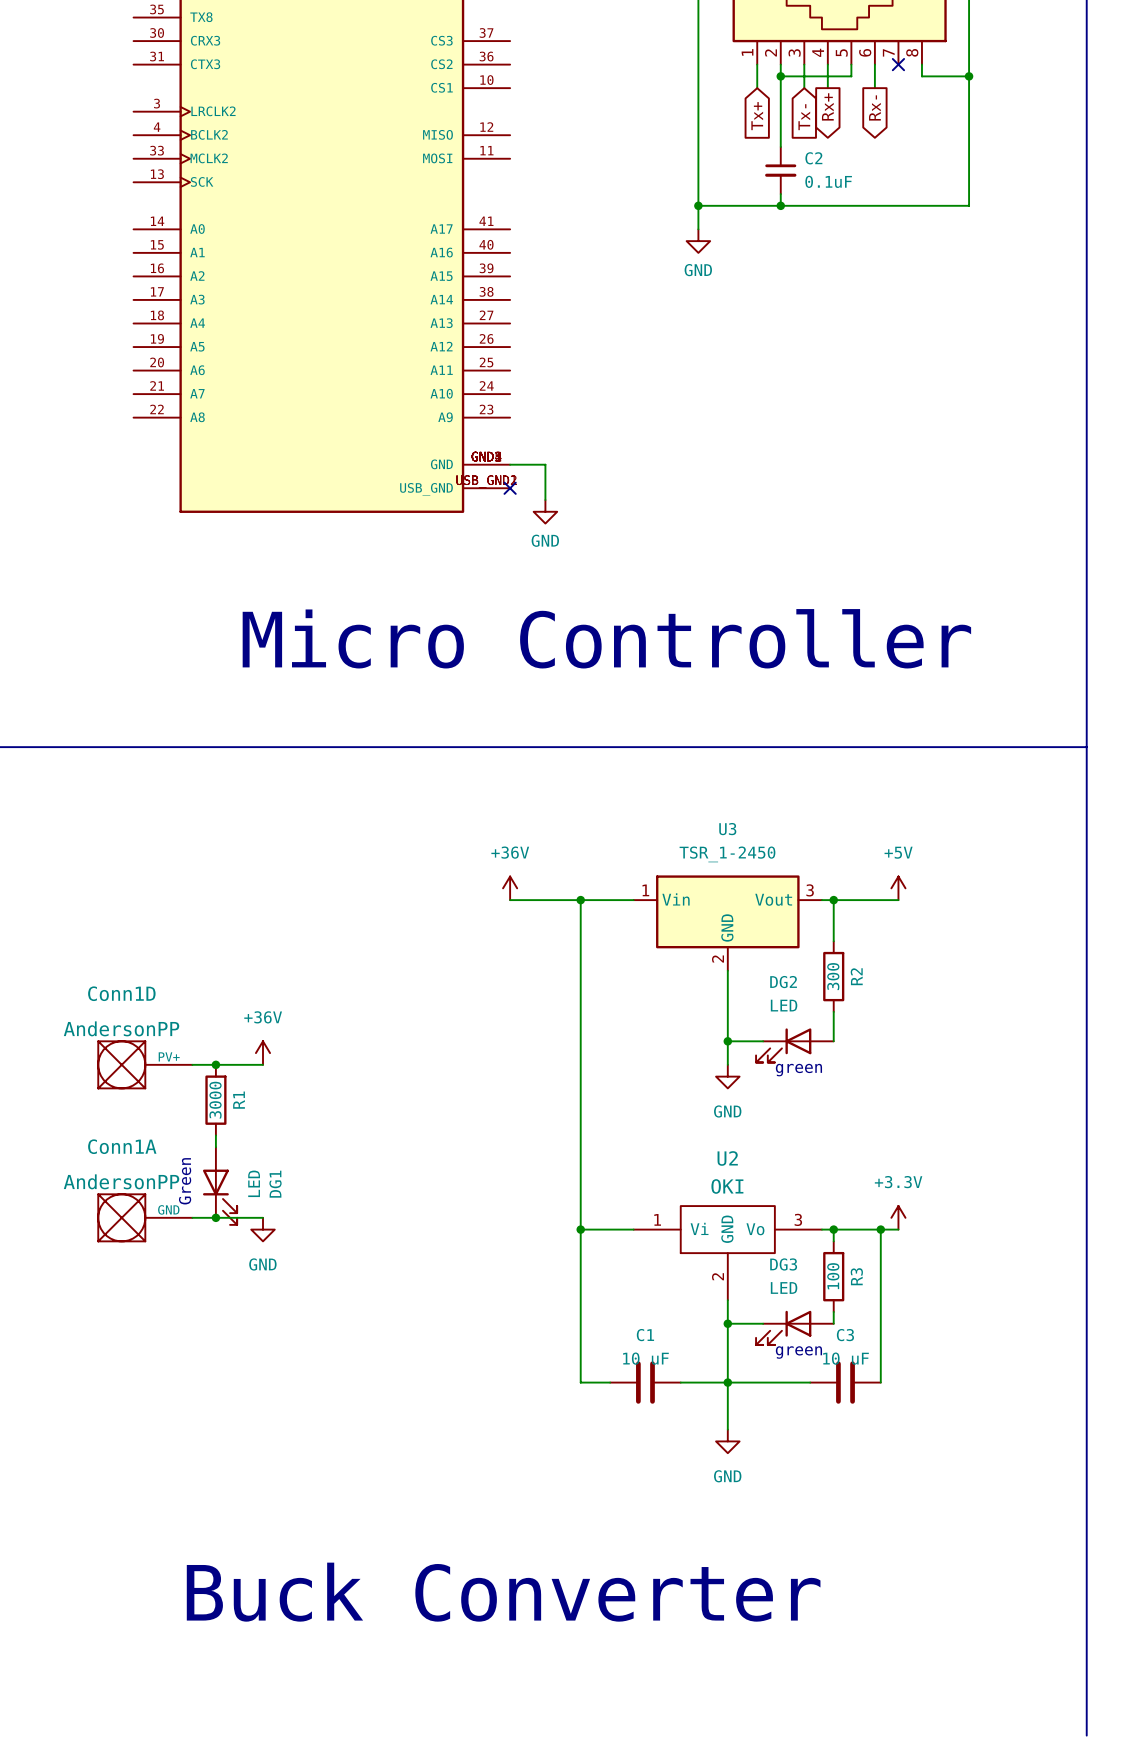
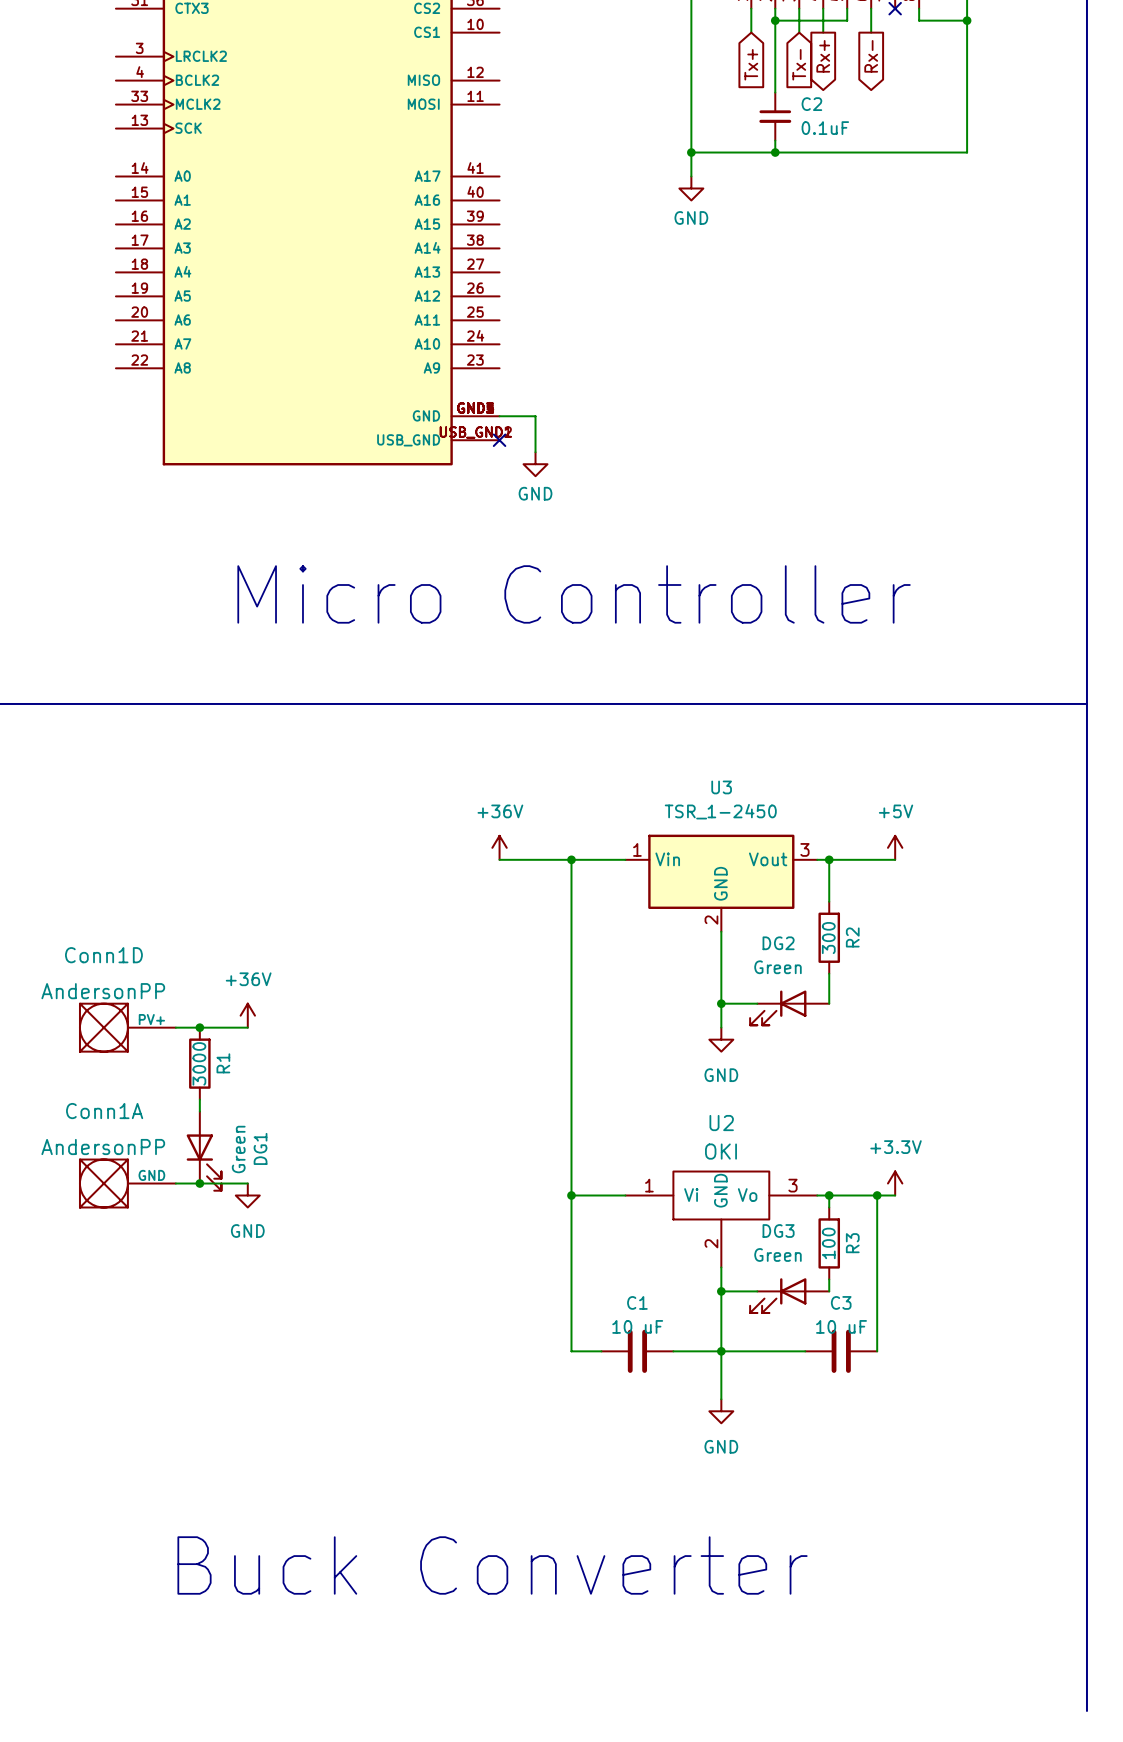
DG2 value: LED (784, 1005) -> Green (778, 967)
text: green (798, 1070) -> none
text: Green (185, 1181) -> none
DG1 value: LED (254, 1183) -> Green (238, 1149)
DG3 value: LED (784, 1287) -> Green (778, 1254)
text: green (798, 1352) -> none

